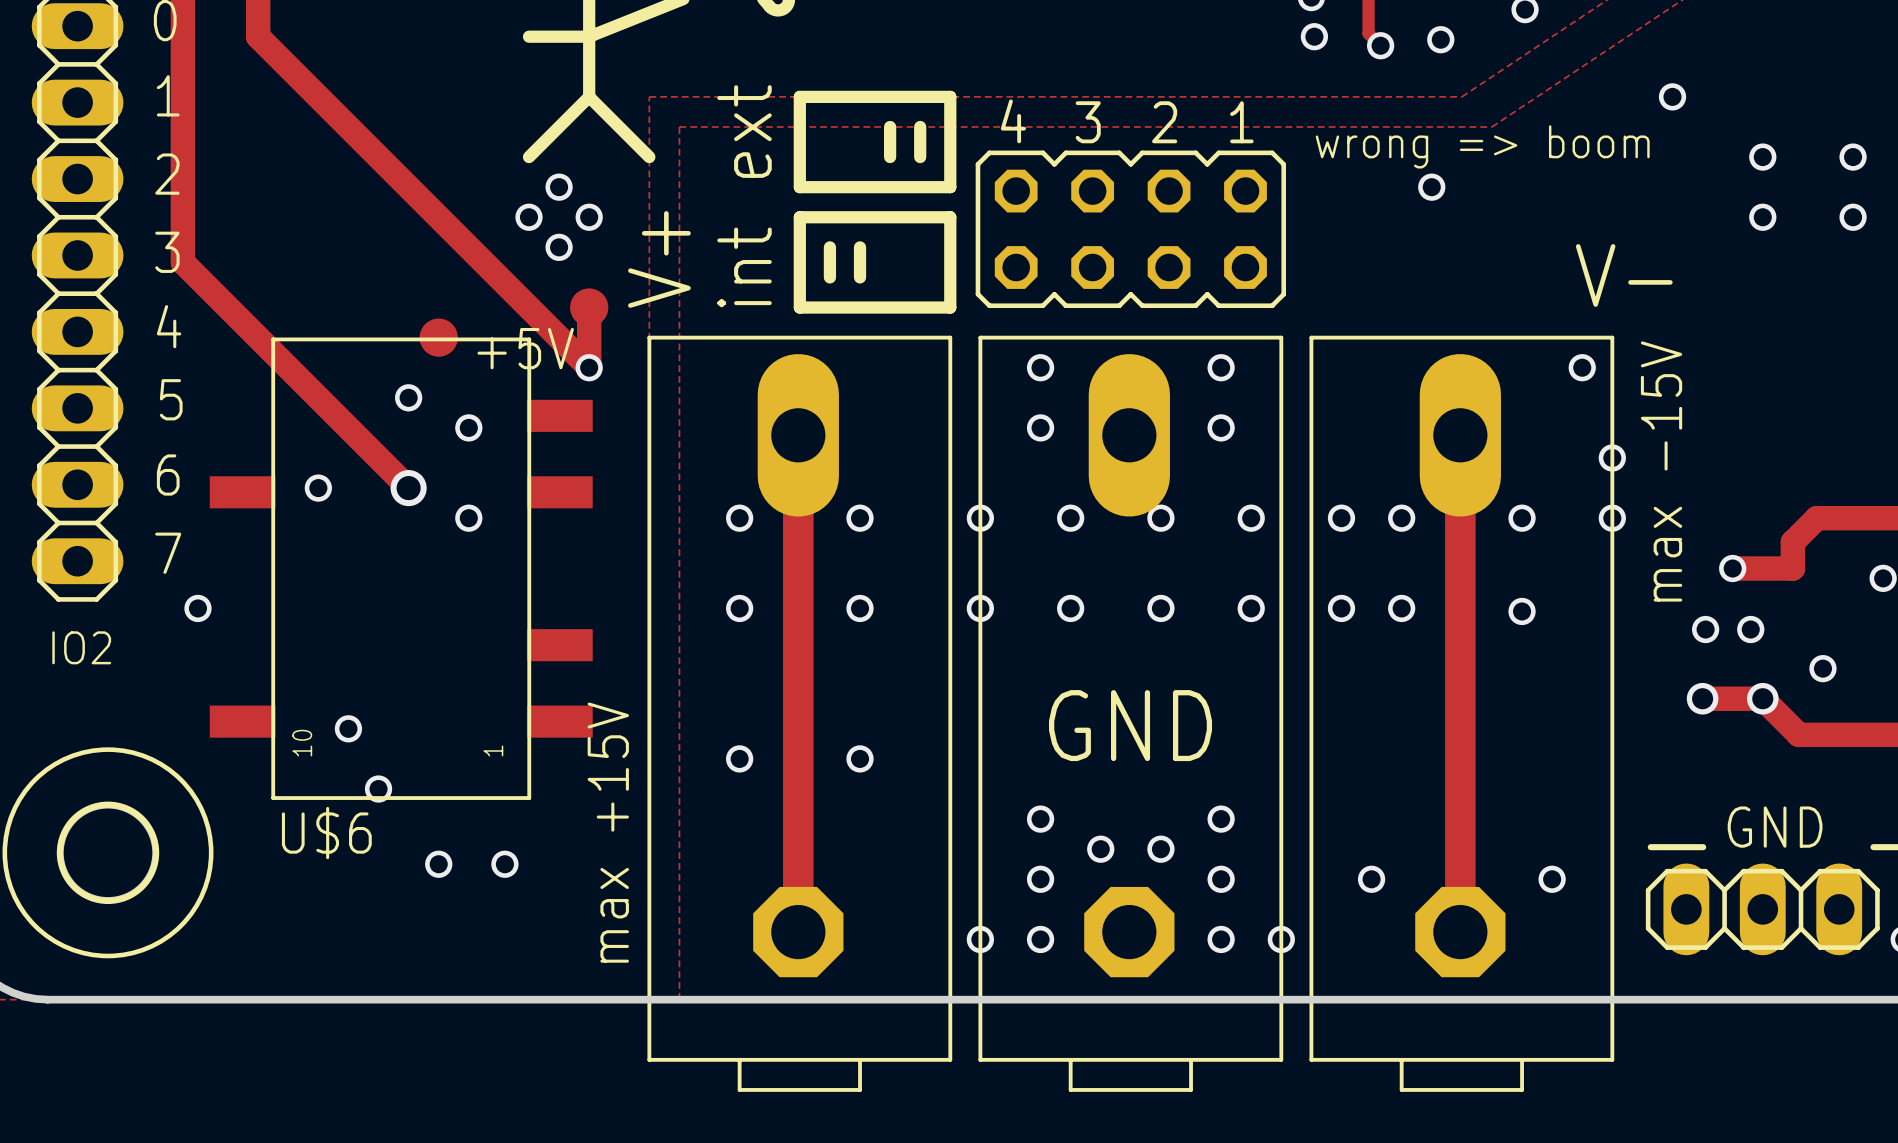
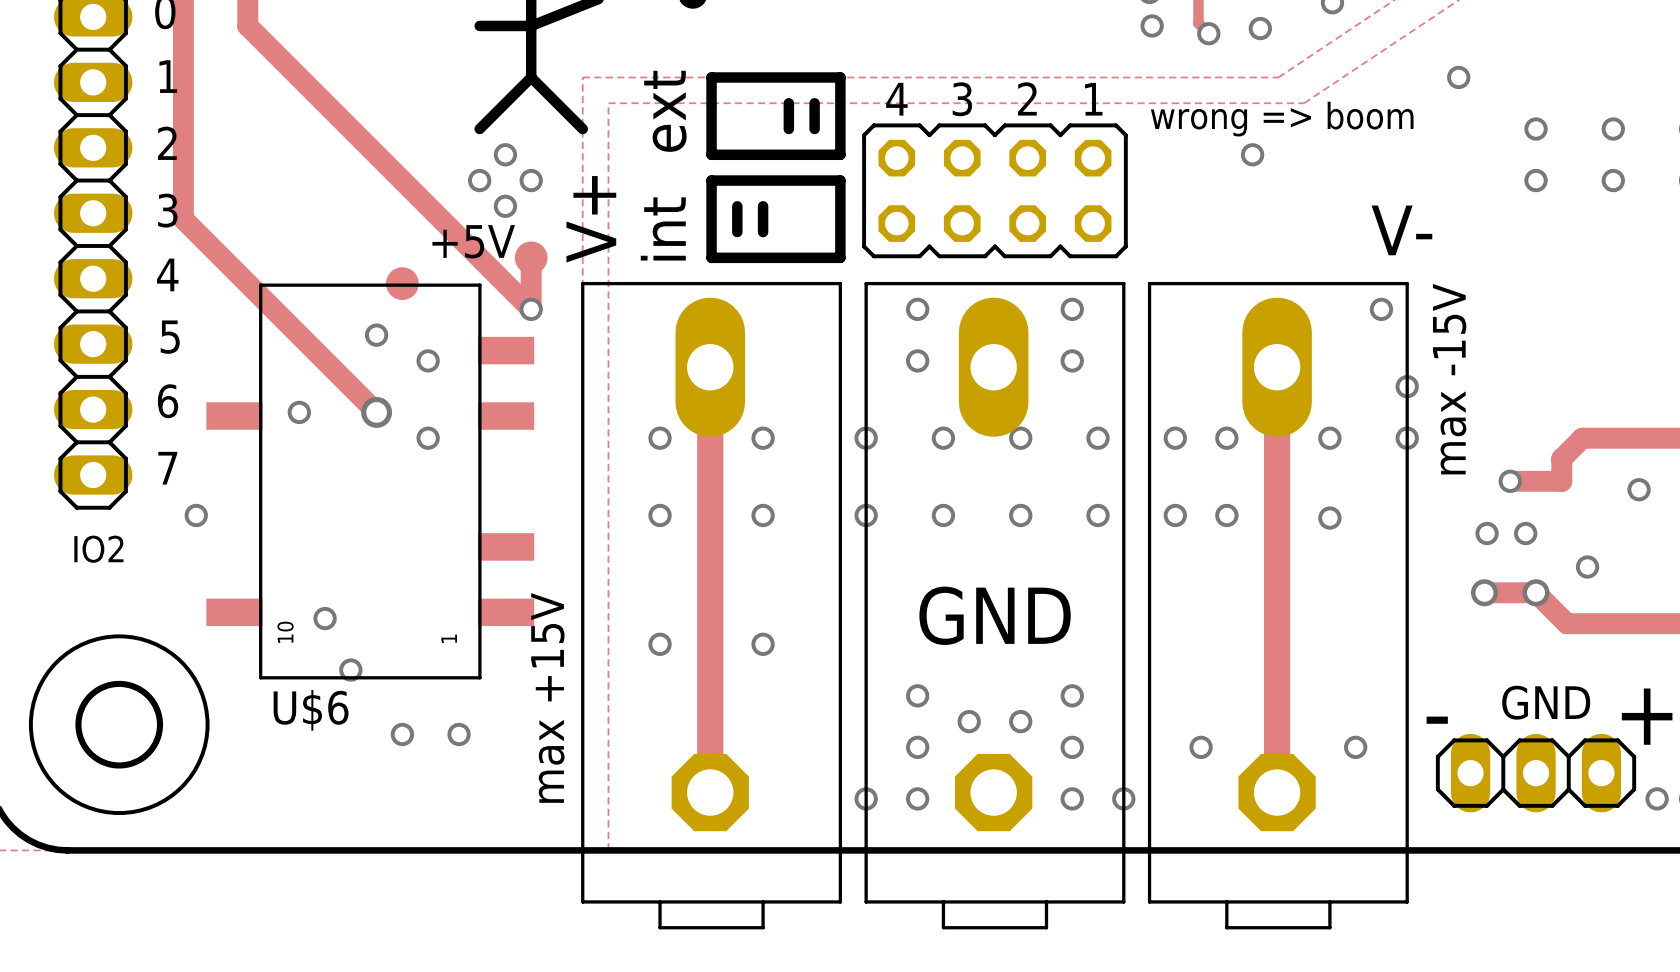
text position: +5V (525, 348) -> +5V (473, 241)

